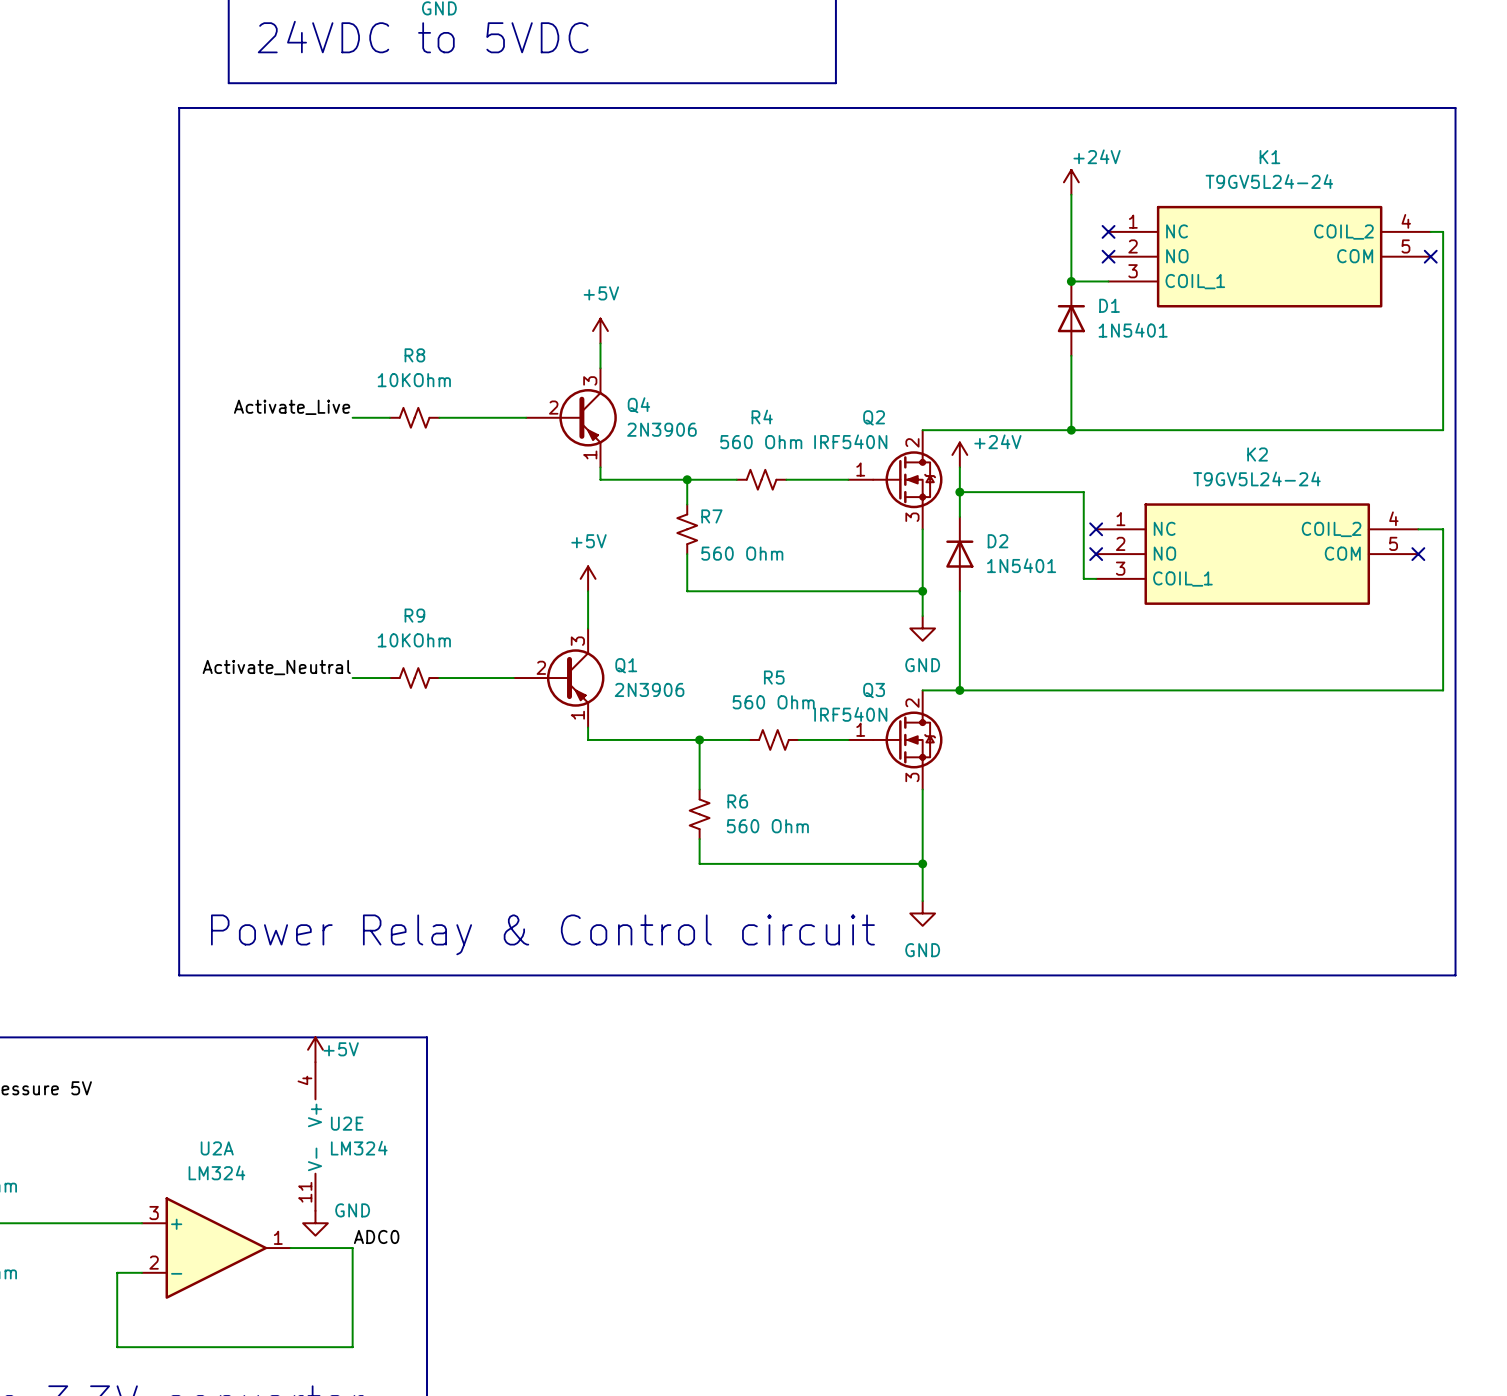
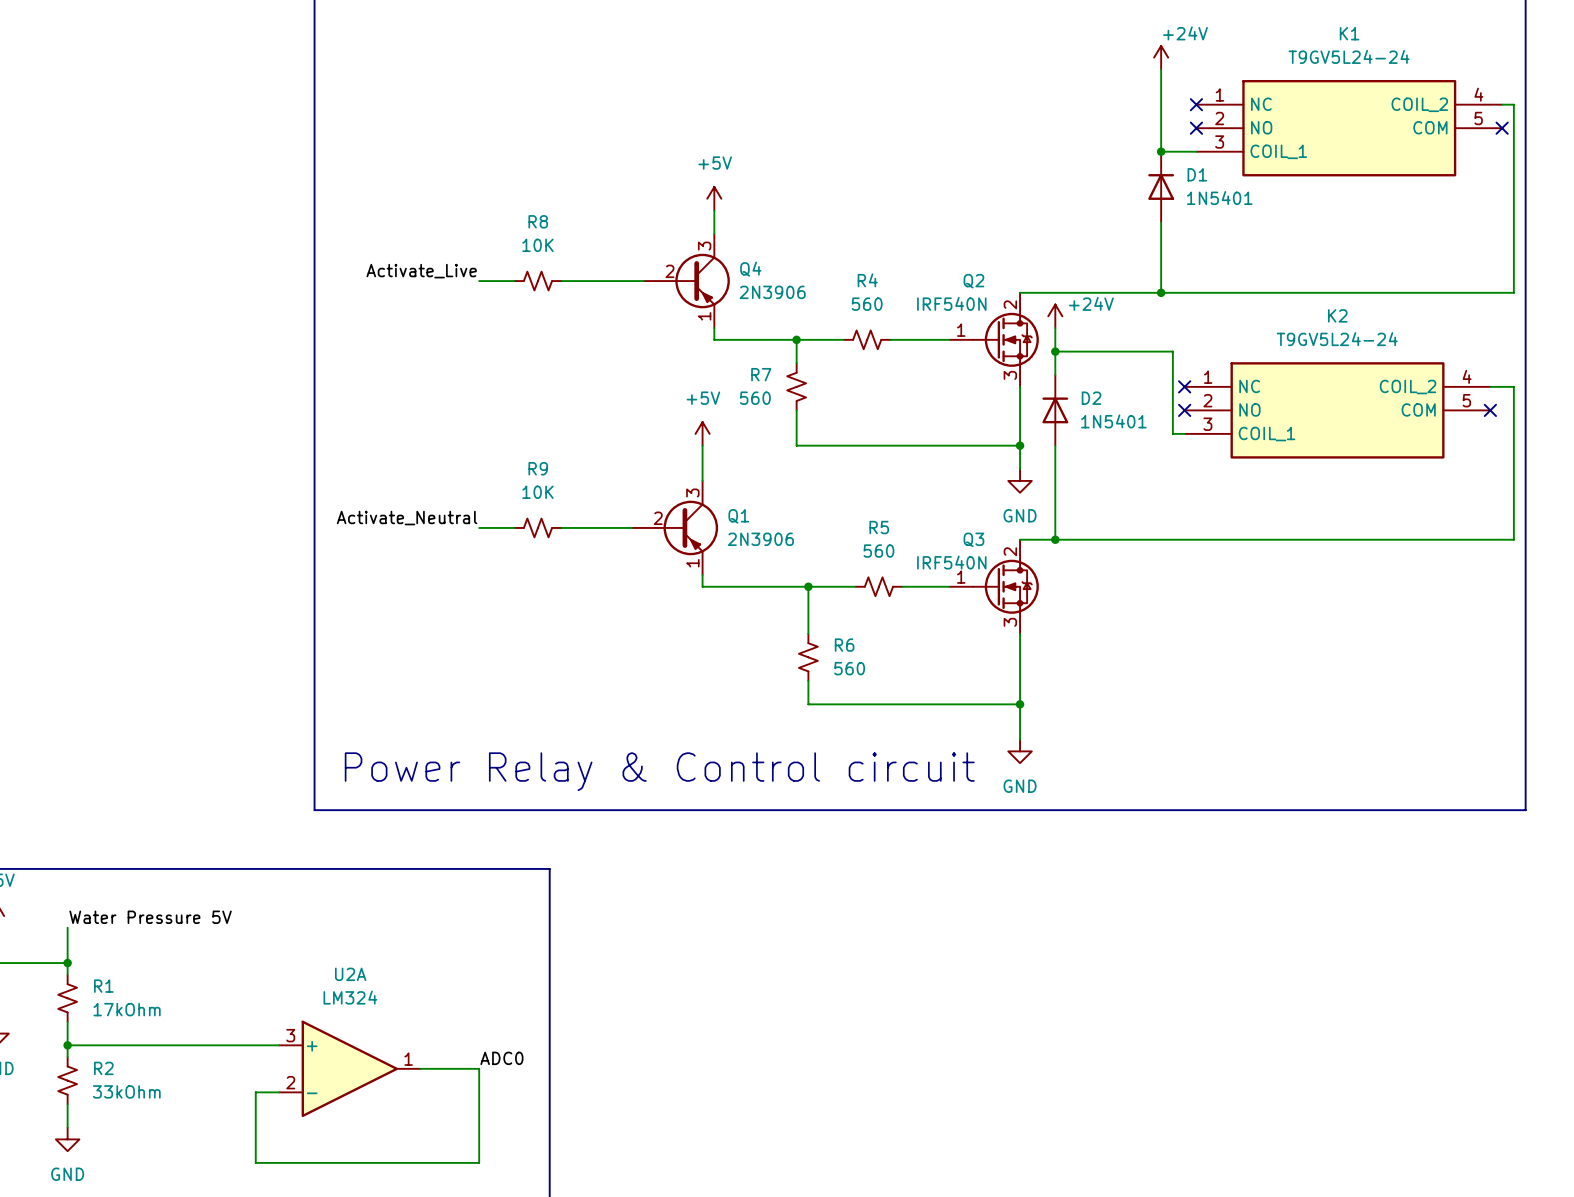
R8 value: 10KOhm (414, 380) -> 10K (537, 245)
R4 value: 560 Ohm (761, 442) -> 560 (867, 304)
R7 name position: R7 (711, 516) -> R7 (761, 374)
R7 value: 560 Ohm (742, 553) -> 560 (755, 398)
R9 value: 10KOhm (414, 640) -> 10K (537, 492)
R5 value: 560 Ohm (773, 702) -> 560 (878, 551)
R6 value: 560 Ohm (767, 826) -> 560 (849, 668)
power symbol: +5V (315, 1049) -> none
U2E: LM324 (315, 1136) -> none
power symbol: GND (315, 1223) -> none

